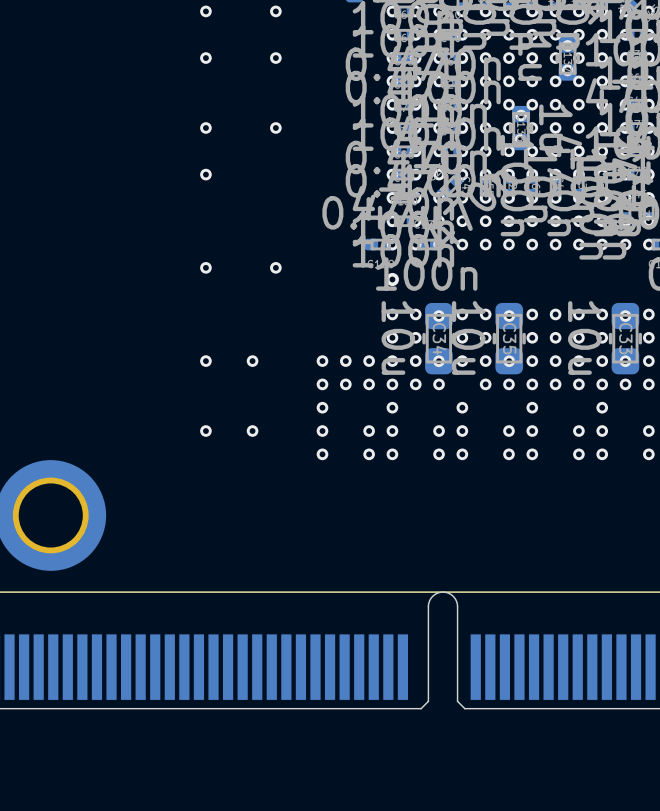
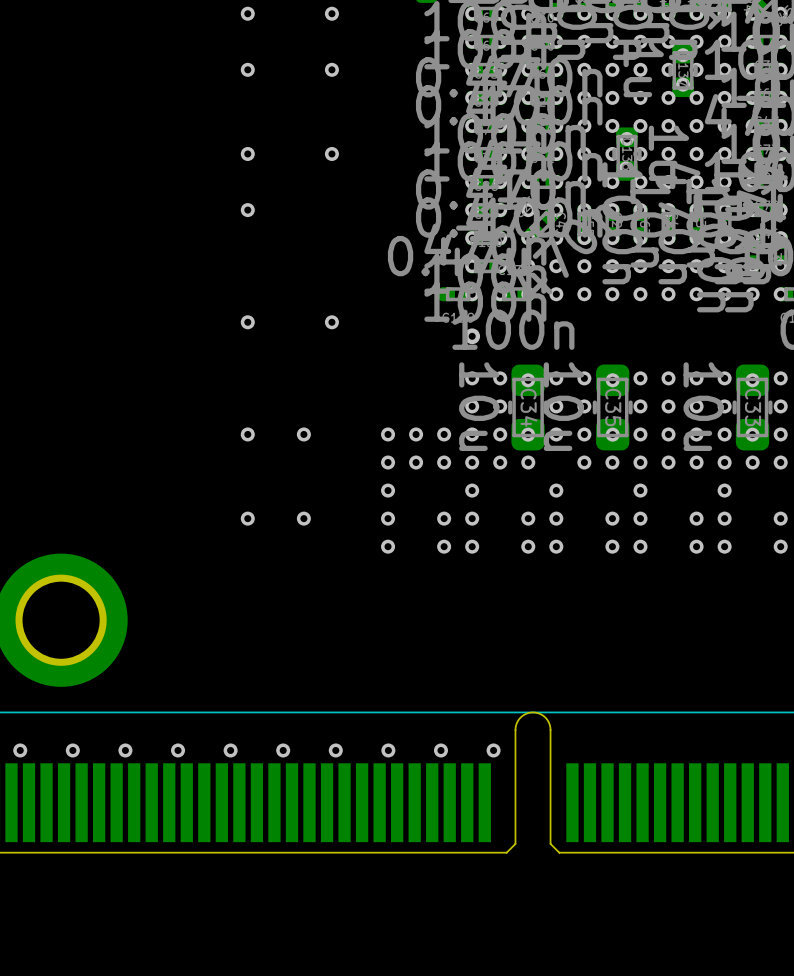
via: none -> (20, 750)
via: none -> (72, 750)
via: none -> (125, 750)
via: none -> (178, 750)
via: none -> (230, 750)
via: none -> (283, 750)
via: none -> (335, 750)
via: none -> (388, 750)
via: none -> (440, 750)
via: none -> (493, 750)

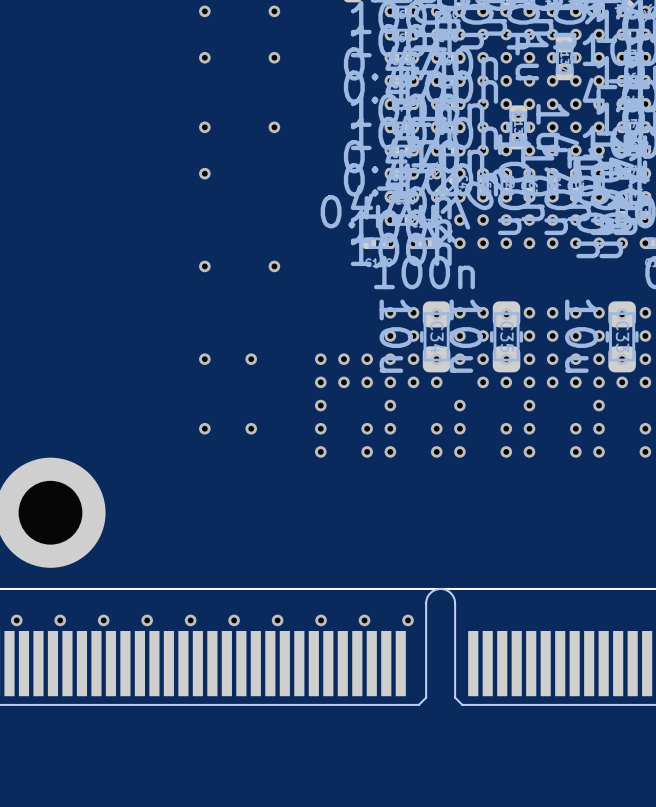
via: (472, 336) -> none

